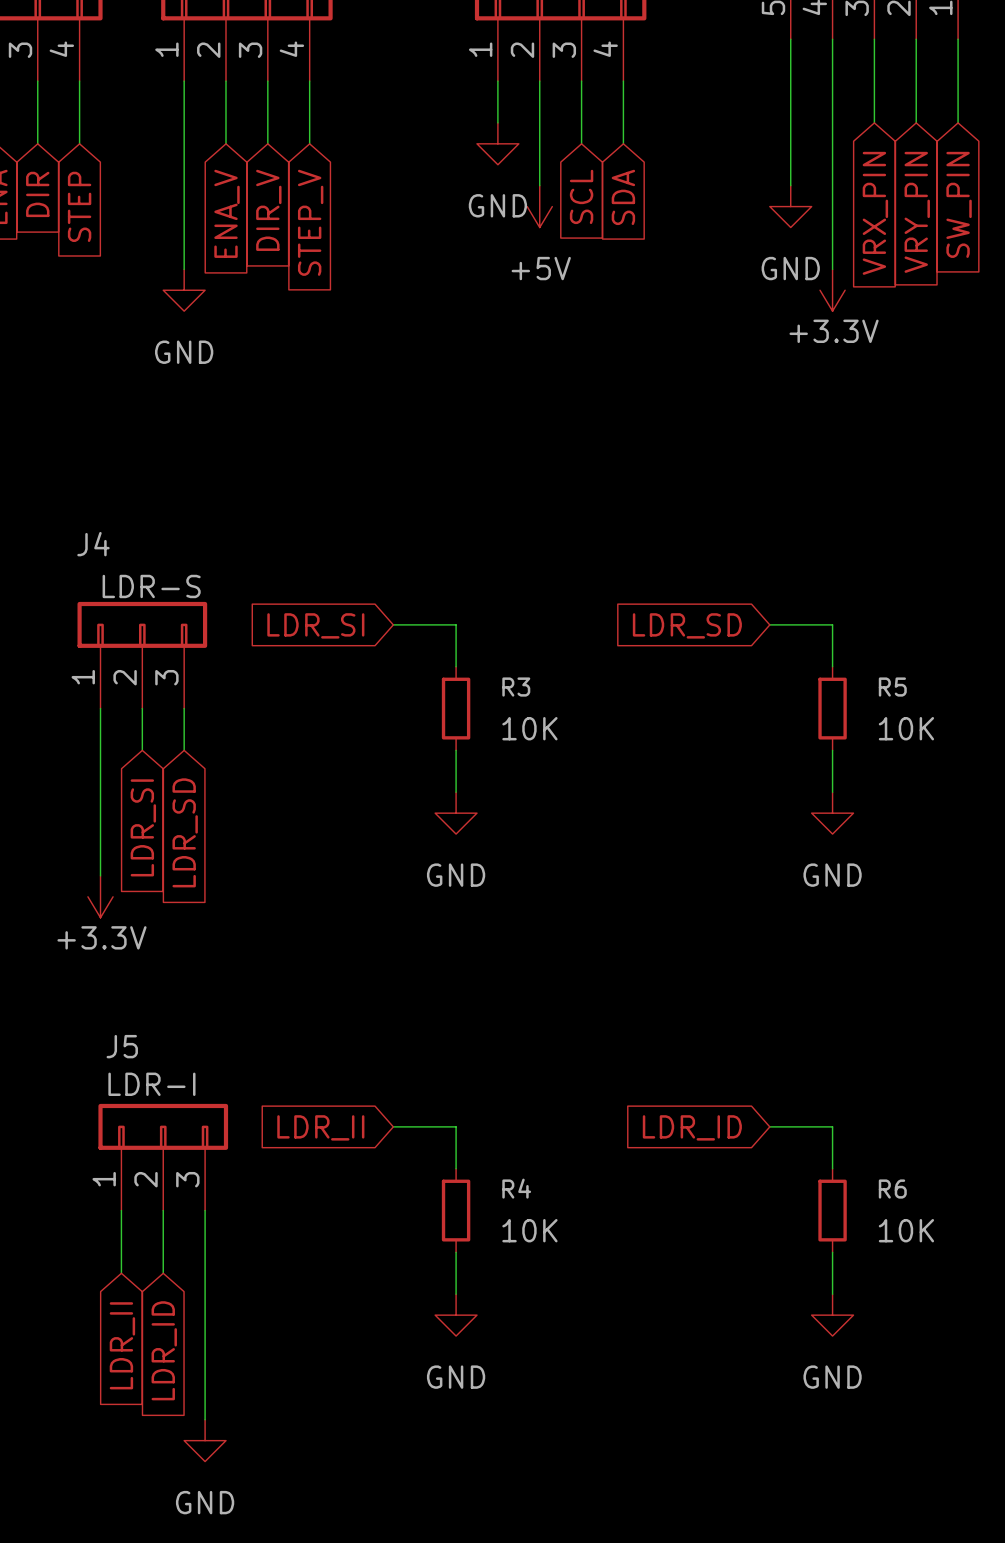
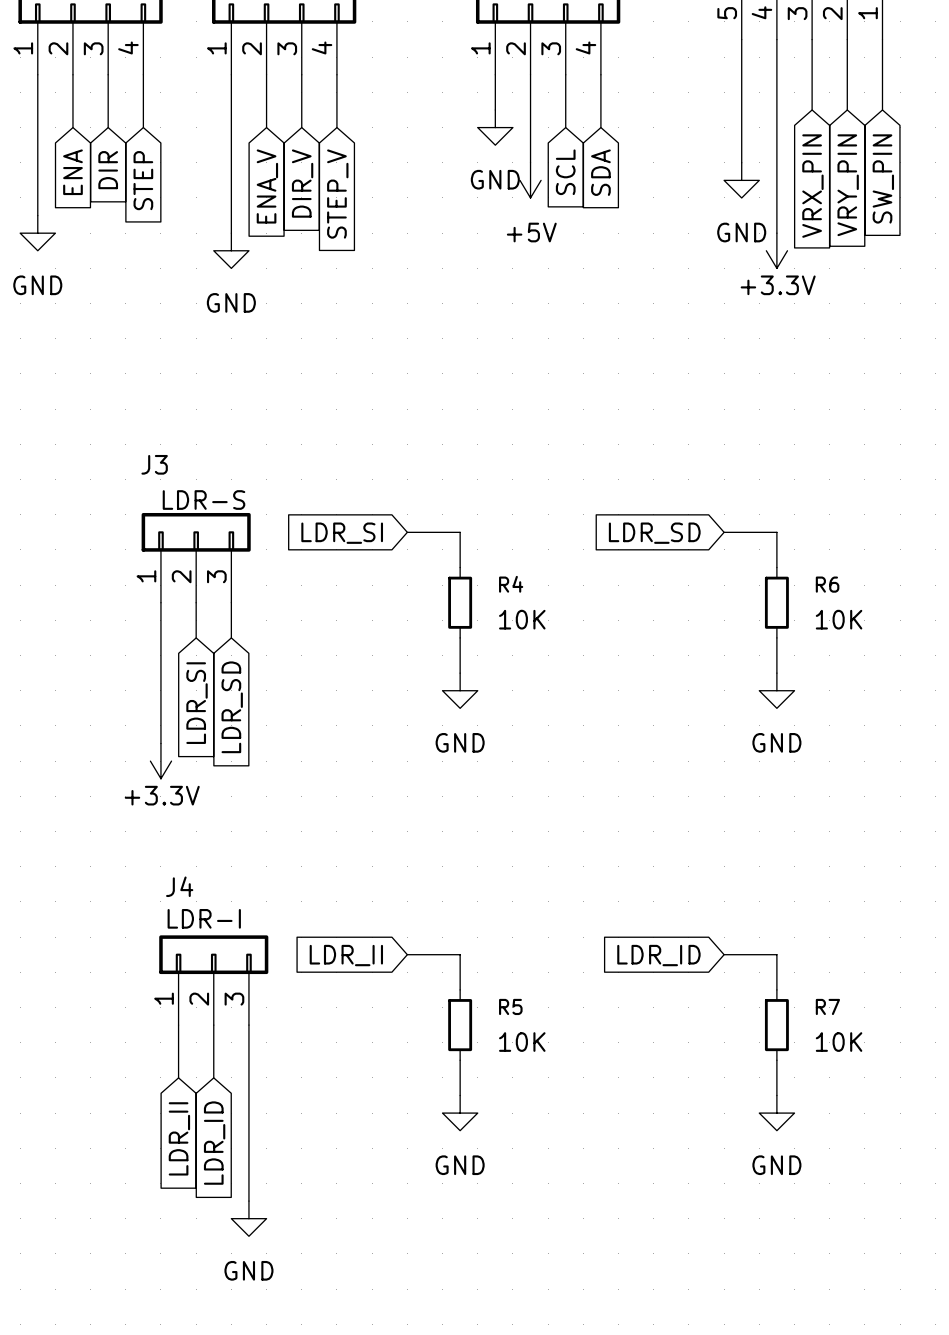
J4 name: J4 (93, 544) -> J3 (154, 464)
R3 name: R3 (516, 687) -> R4 (511, 584)
R5 name: R5 (892, 687) -> R6 (827, 584)
J5 name: J5 (122, 1046) -> J4 (179, 886)
R4 name: R4 (516, 1188) -> R5 (510, 1006)
R6 name: R6 (892, 1189) -> R7 (827, 1006)

